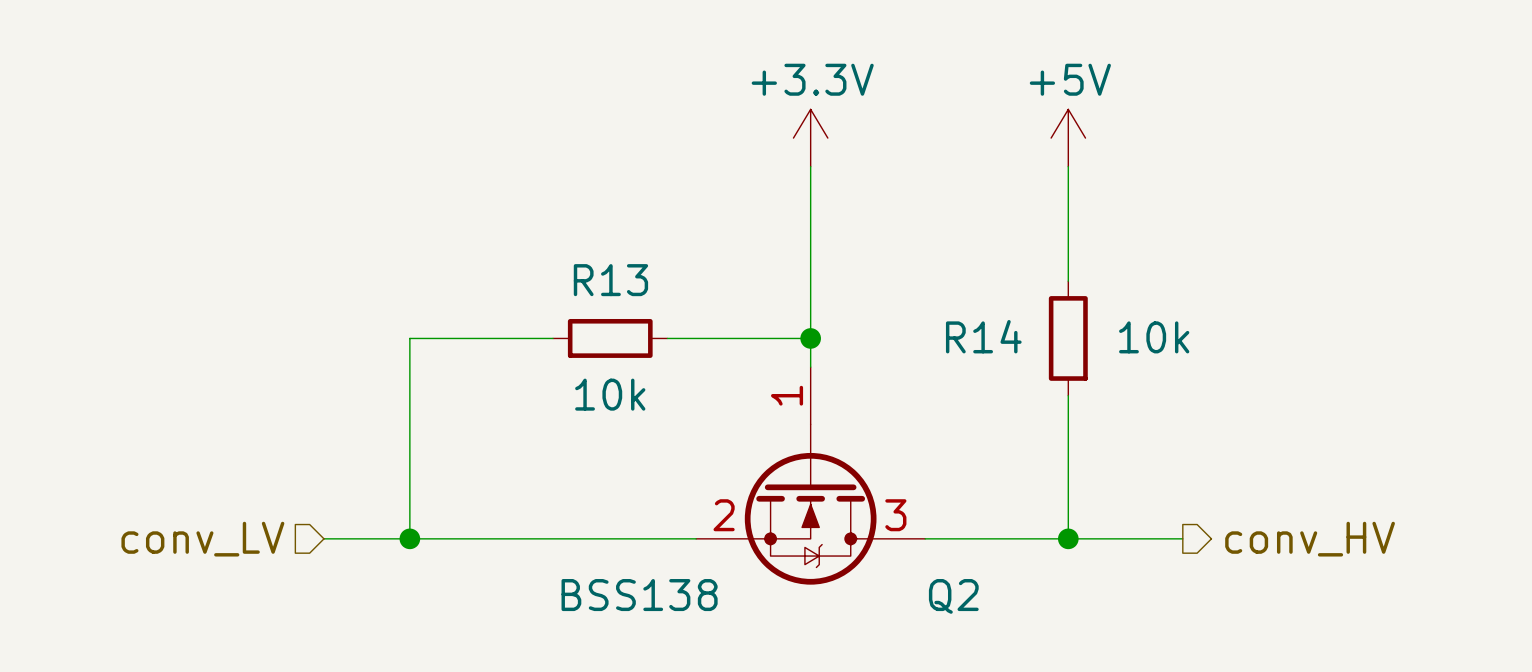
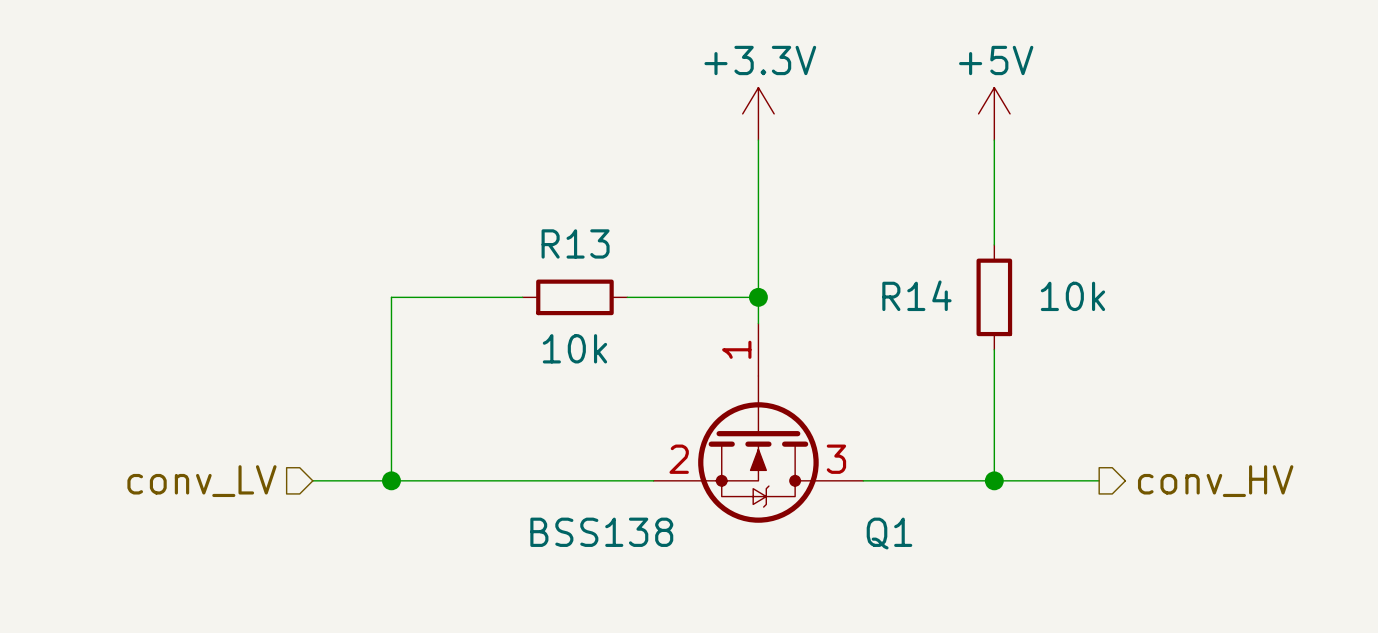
Q2 name: Q2 (953, 596) -> Q1 (889, 533)

